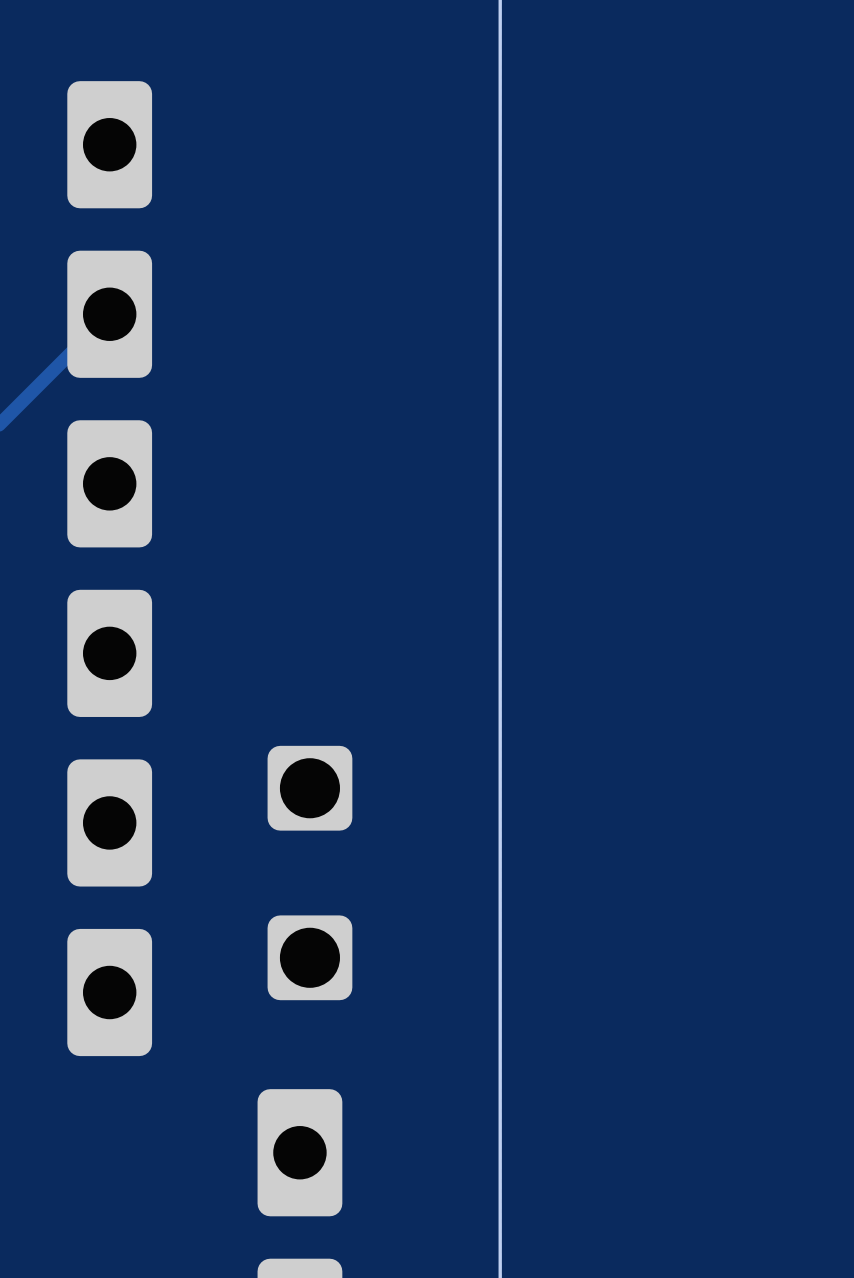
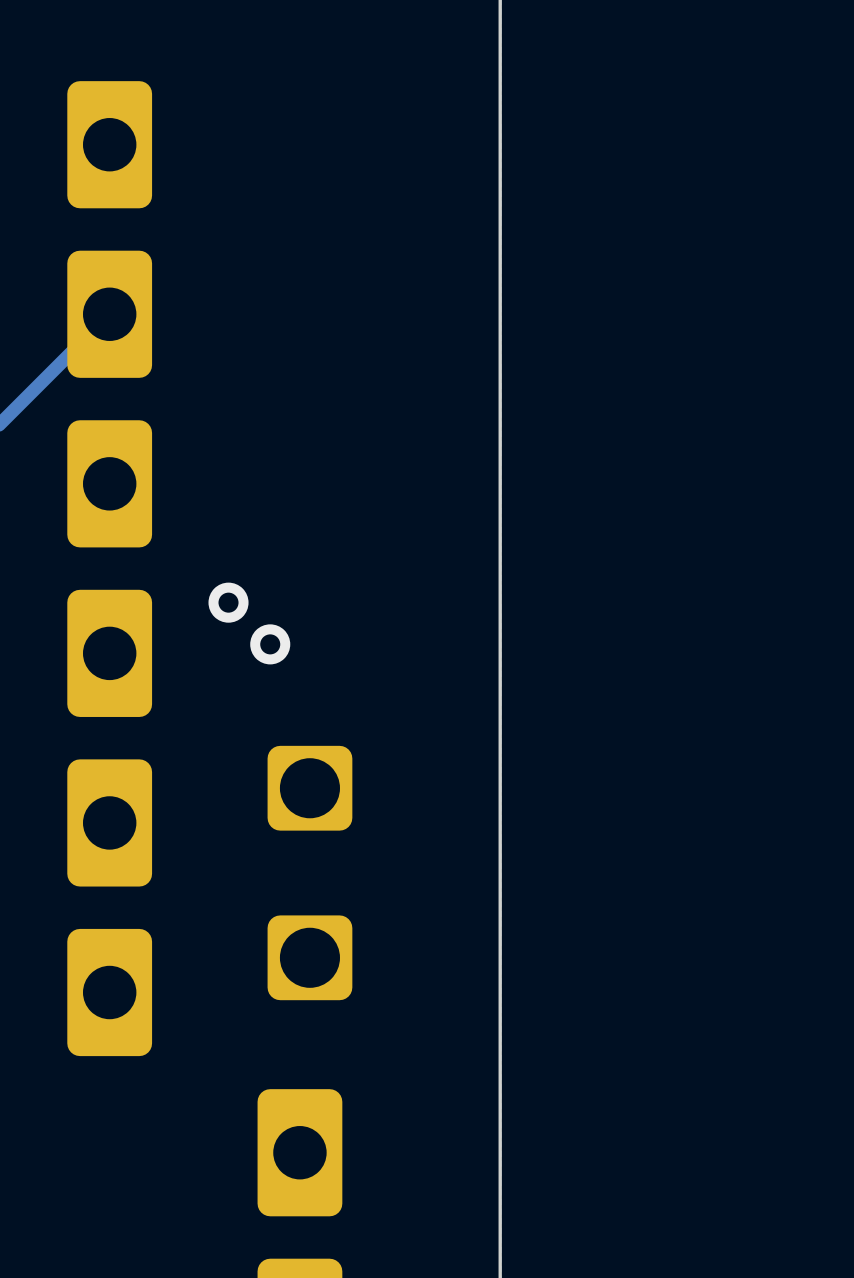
via: none -> (228, 602)
via: none -> (270, 644)

